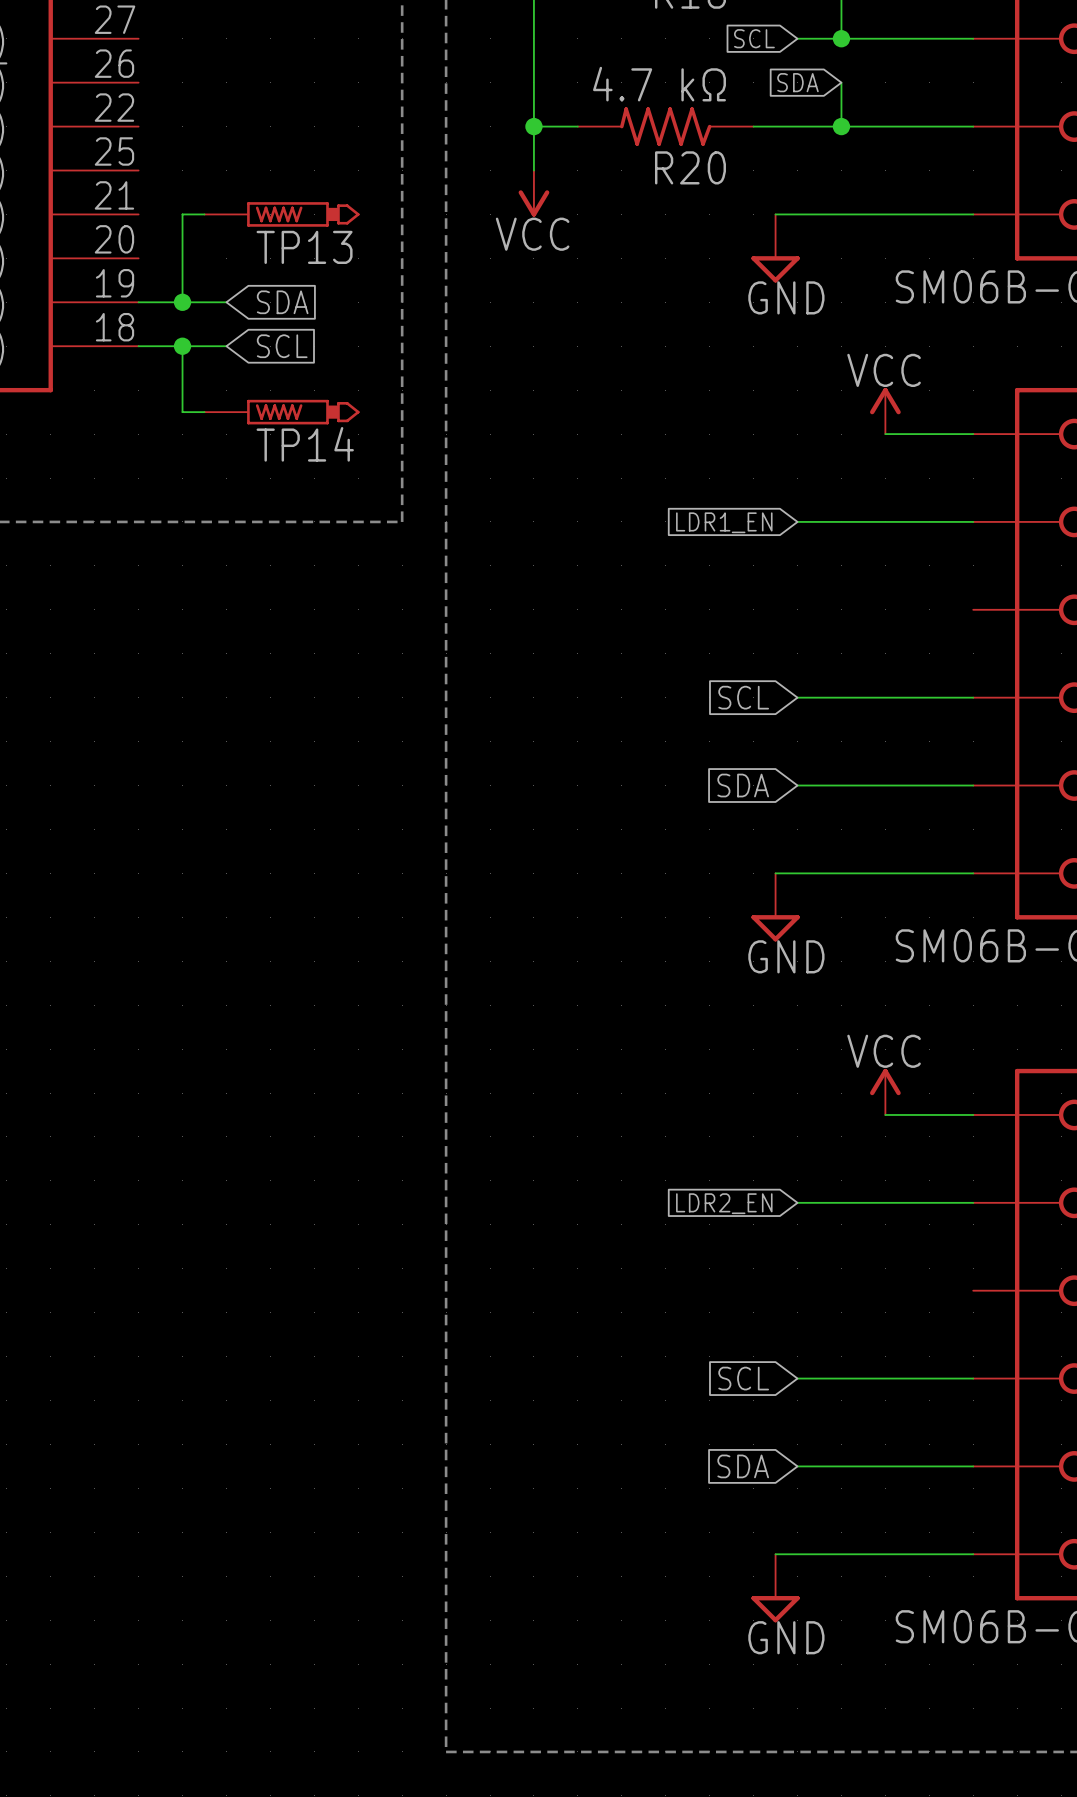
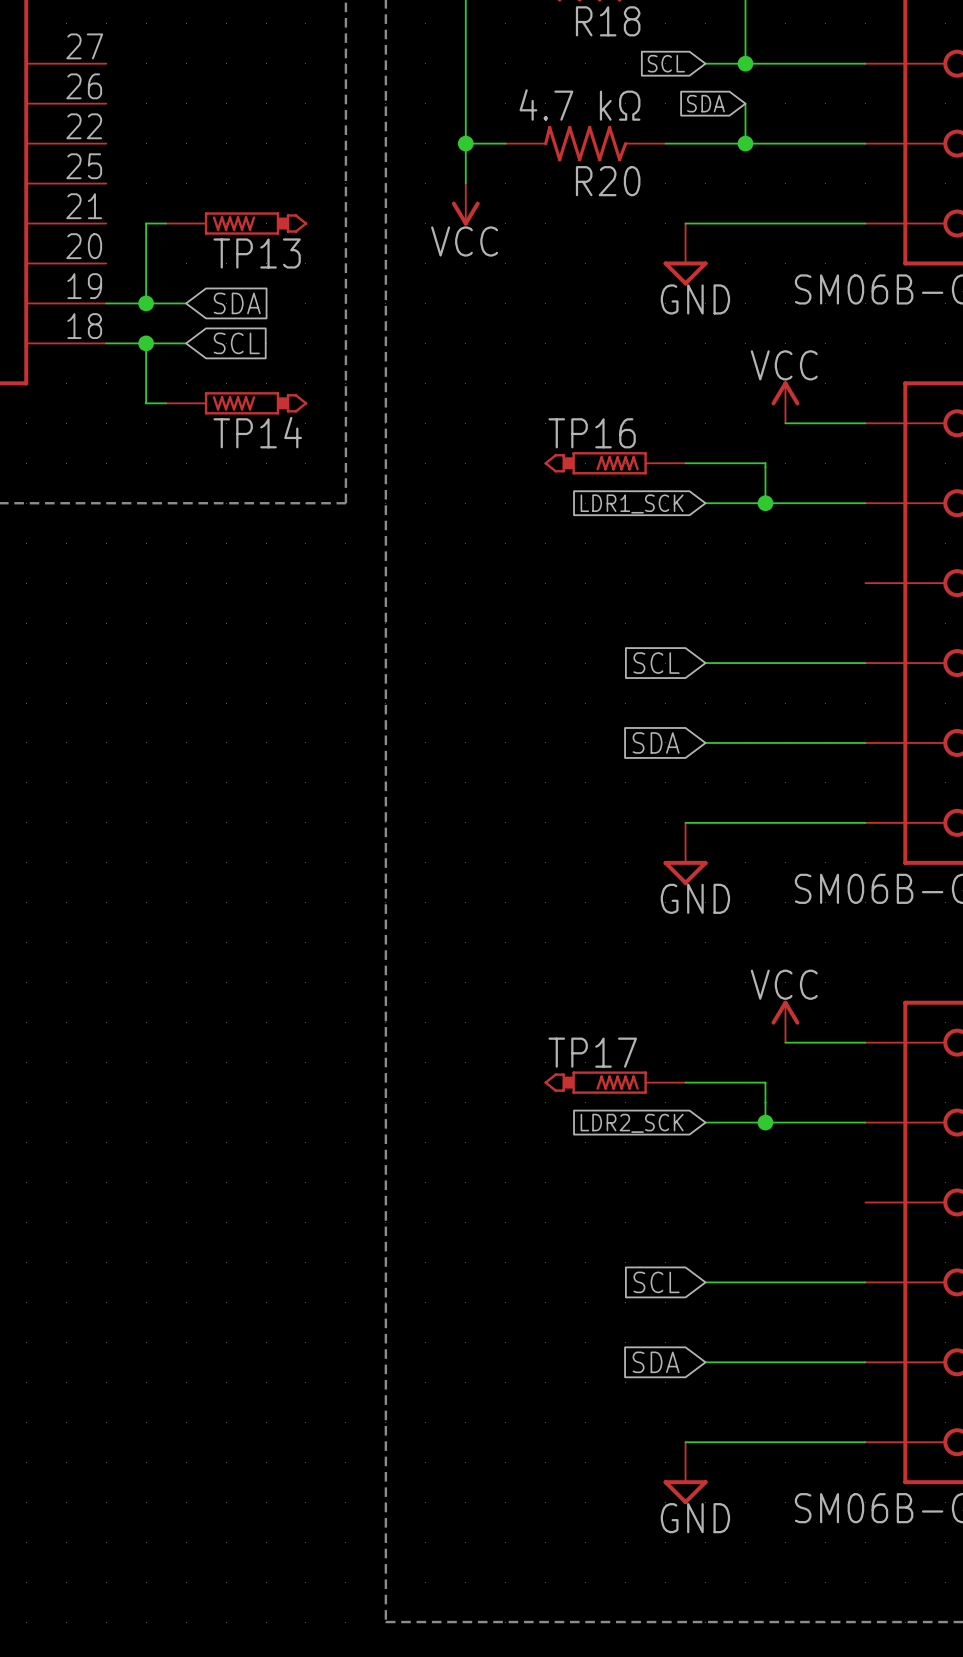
TP16: none -> (615, 463)
wire: none -> (685, 463) (765, 463) (765, 503)
junction: none -> (765, 503)
global label: LDR1_EN (724, 522) -> LDR1_SCK (632, 503)
TP17: none -> (615, 1082)
wire: none -> (685, 1082) (765, 1082) (765, 1122)
junction: none -> (765, 1122)
global label: LDR2_EN (724, 1203) -> LDR2_SCK (632, 1123)

